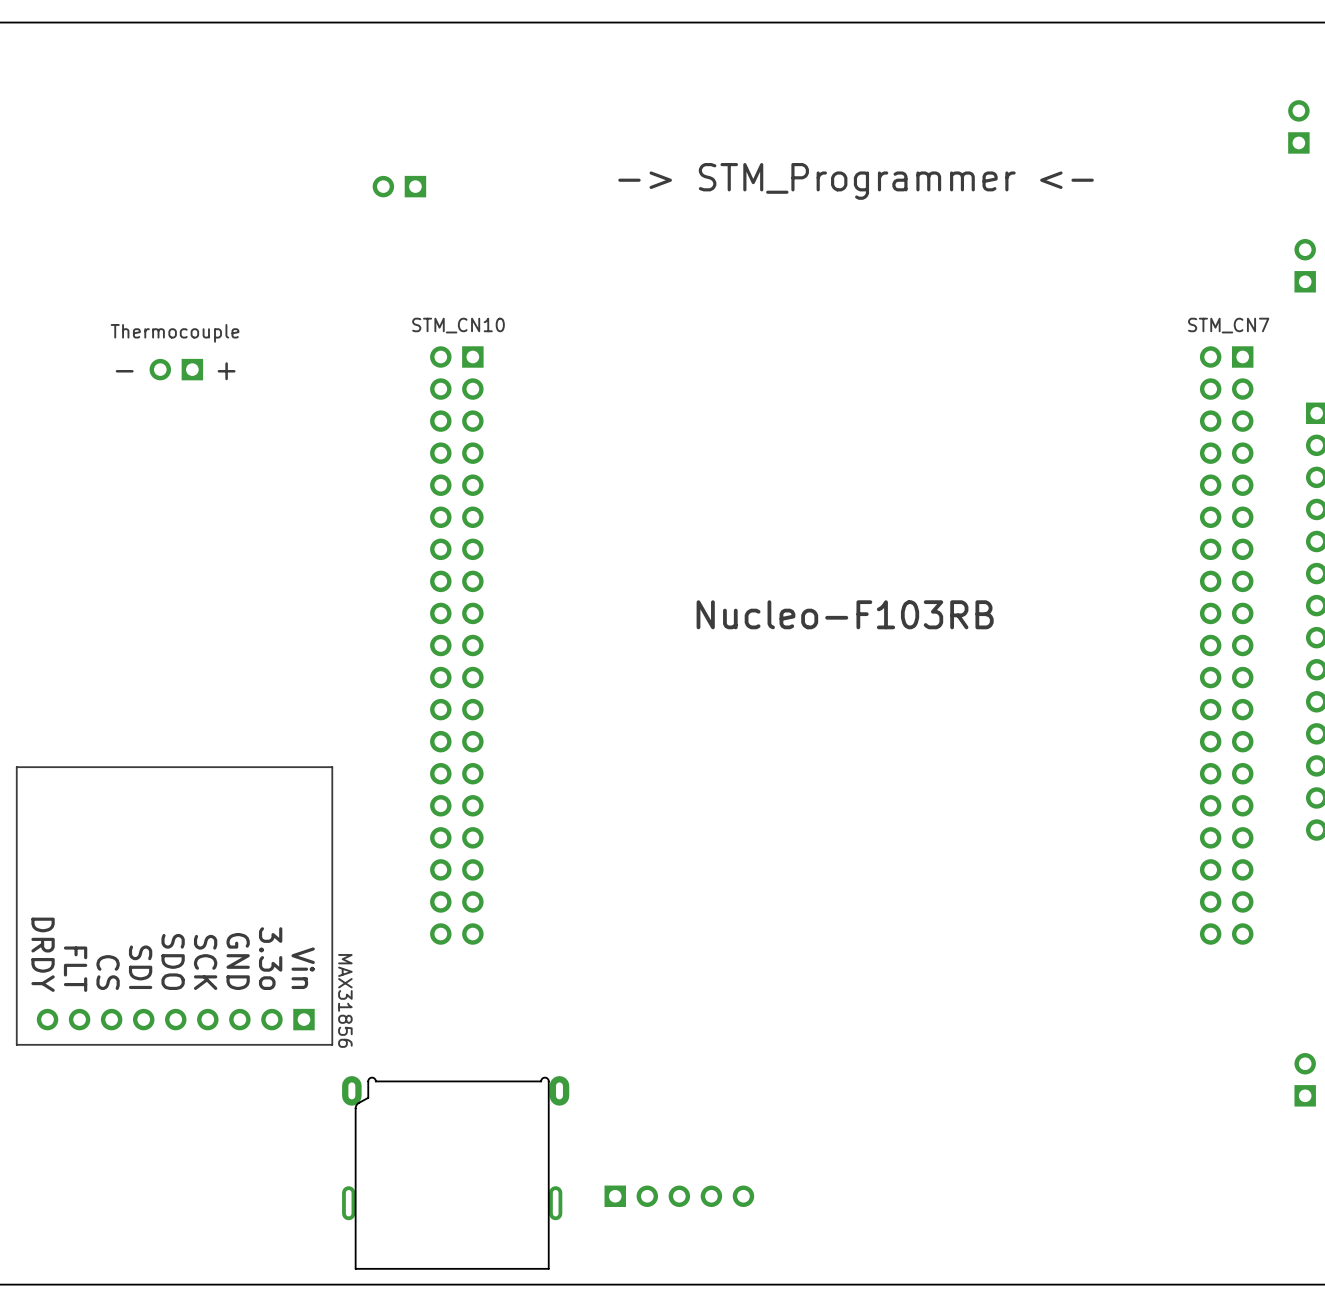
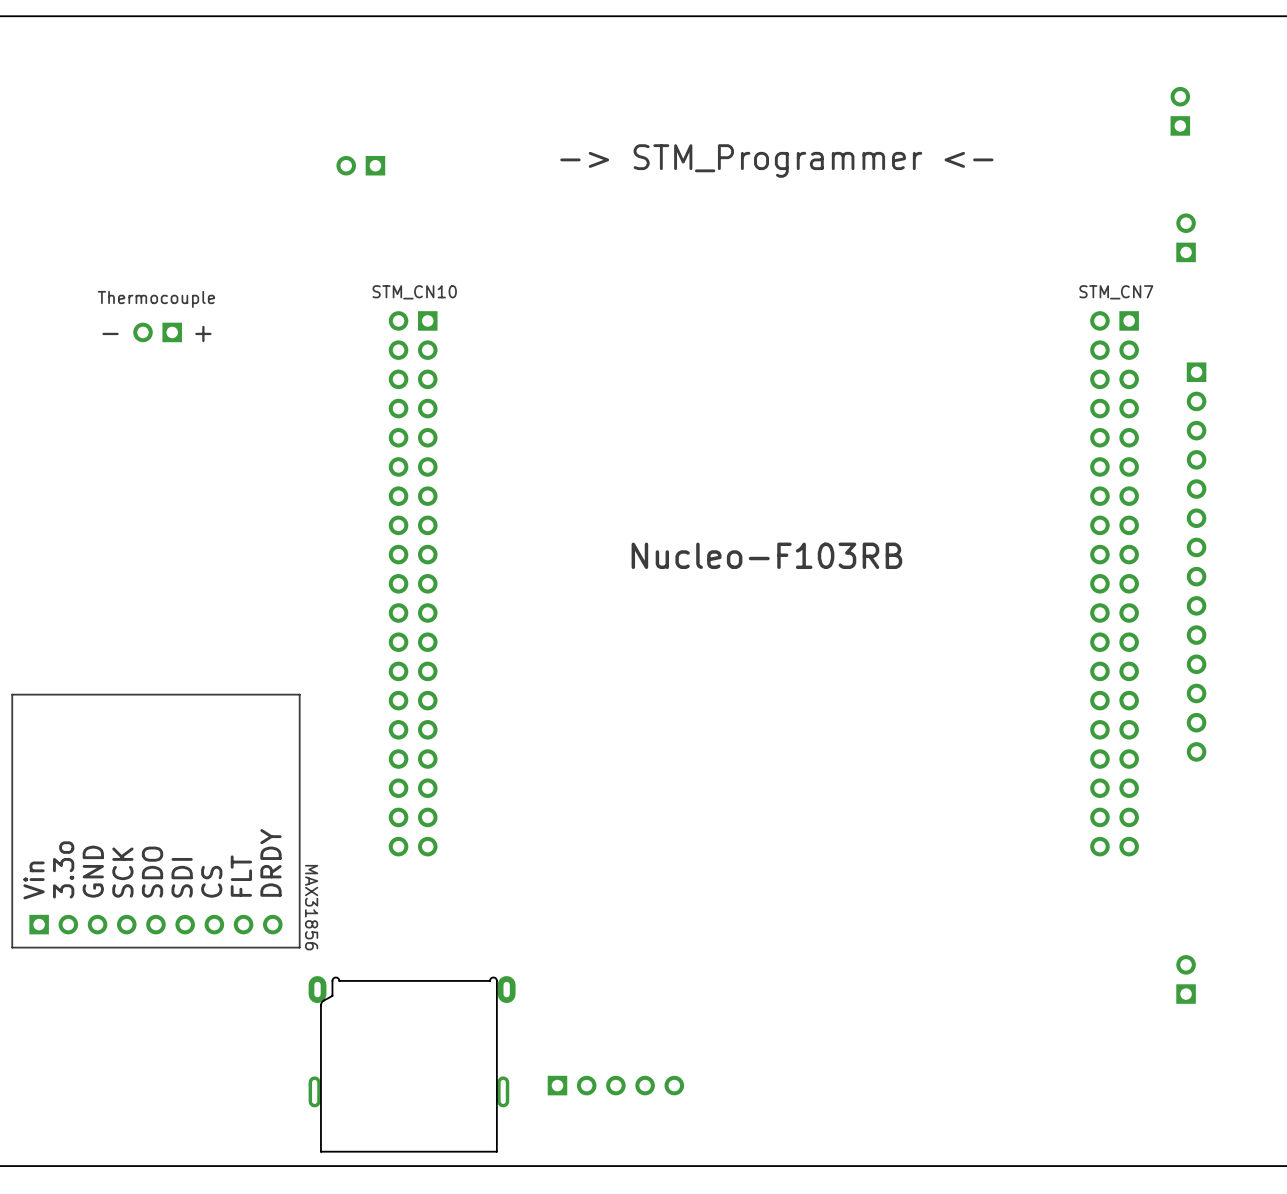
text rotation: 0° (43, 954) -> 180° (270, 862)
text position: DRDY (43, 954) -> DRDY (270, 862)
text rotation: 0° (270, 958) -> 180° (63, 869)
text position: 3.3o (270, 958) -> 3.3o (63, 869)
text rotation: 0° (173, 961) -> 180° (152, 872)
text rotation: 0° (238, 961) -> 180° (93, 871)
text position: GND (238, 961) -> GND (93, 871)
text rotation: 0° (205, 962) -> 180° (122, 872)
text rotation: 0° (140, 967) -> 180° (182, 877)
text rotation: 0° (303, 968) -> 180° (34, 880)
text position: Vin (303, 968) -> Vin (34, 880)
text rotation: 0° (75, 969) -> 180° (241, 876)
text position: FLT (75, 969) -> FLT (241, 876)
text rotation: 0° (108, 972) -> 180° (211, 881)
text position: CS (108, 972) -> CS (211, 881)
part rotation: 0° (175, 1019) -> 180° (155, 924)

